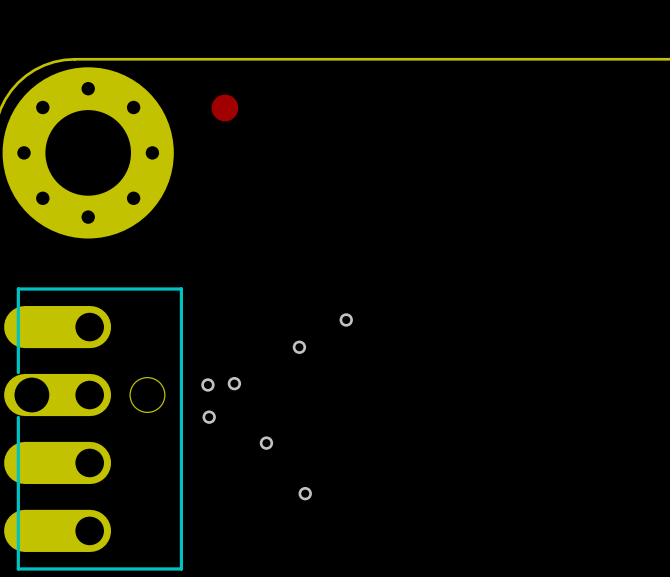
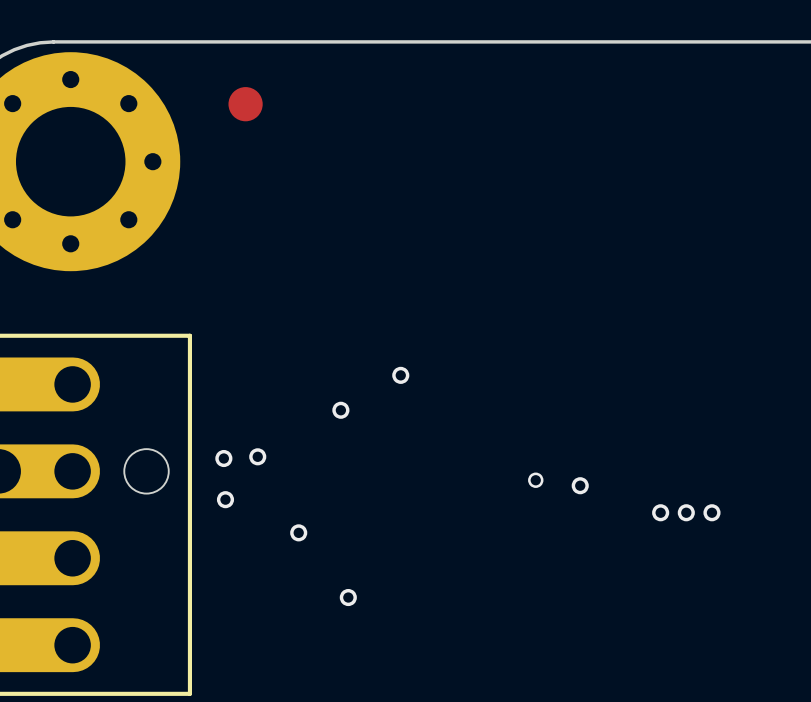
via: none -> (535, 480)
via: none -> (580, 485)
via: none -> (660, 512)
via: none -> (686, 512)
via: none -> (711, 512)

